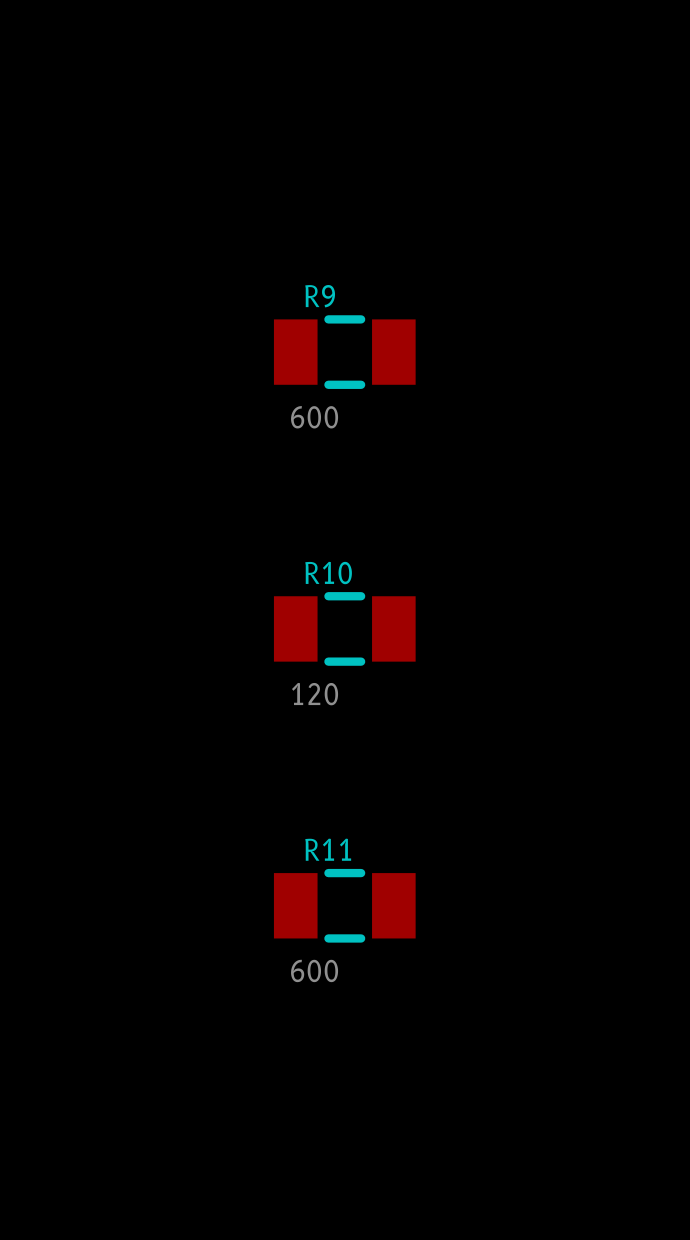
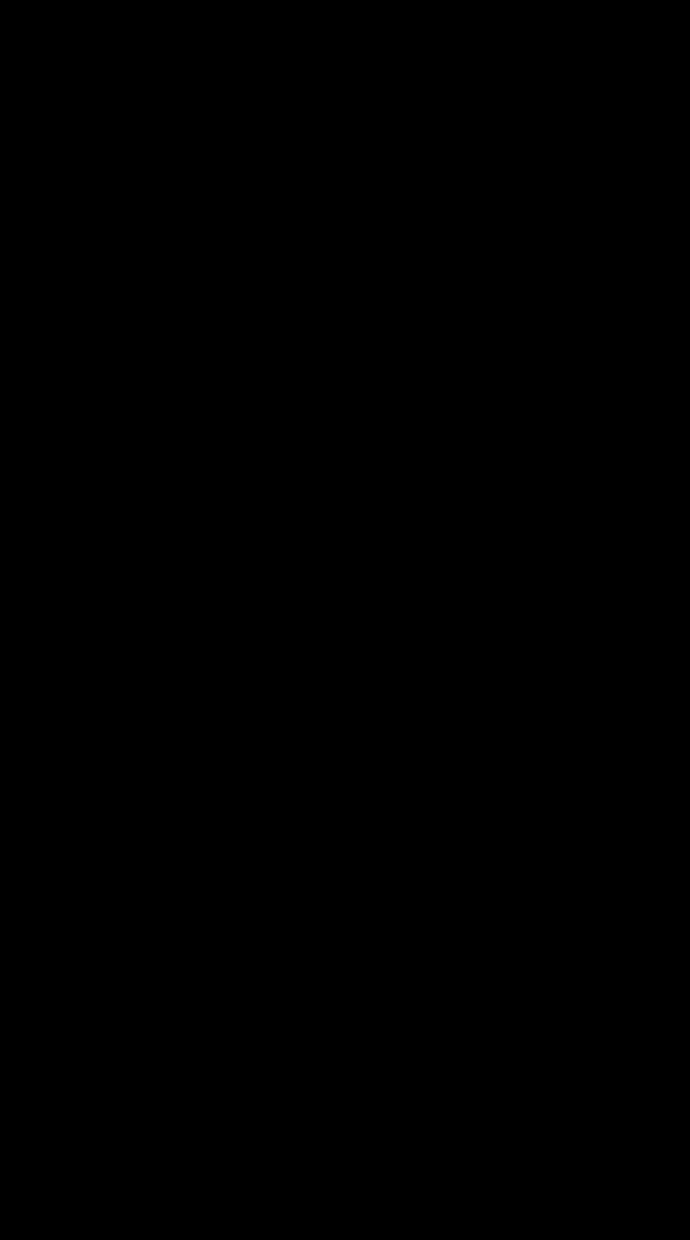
R9: 600 (344, 352) -> none
R10: 120 (344, 628) -> none
R11: 600 (344, 905) -> none

